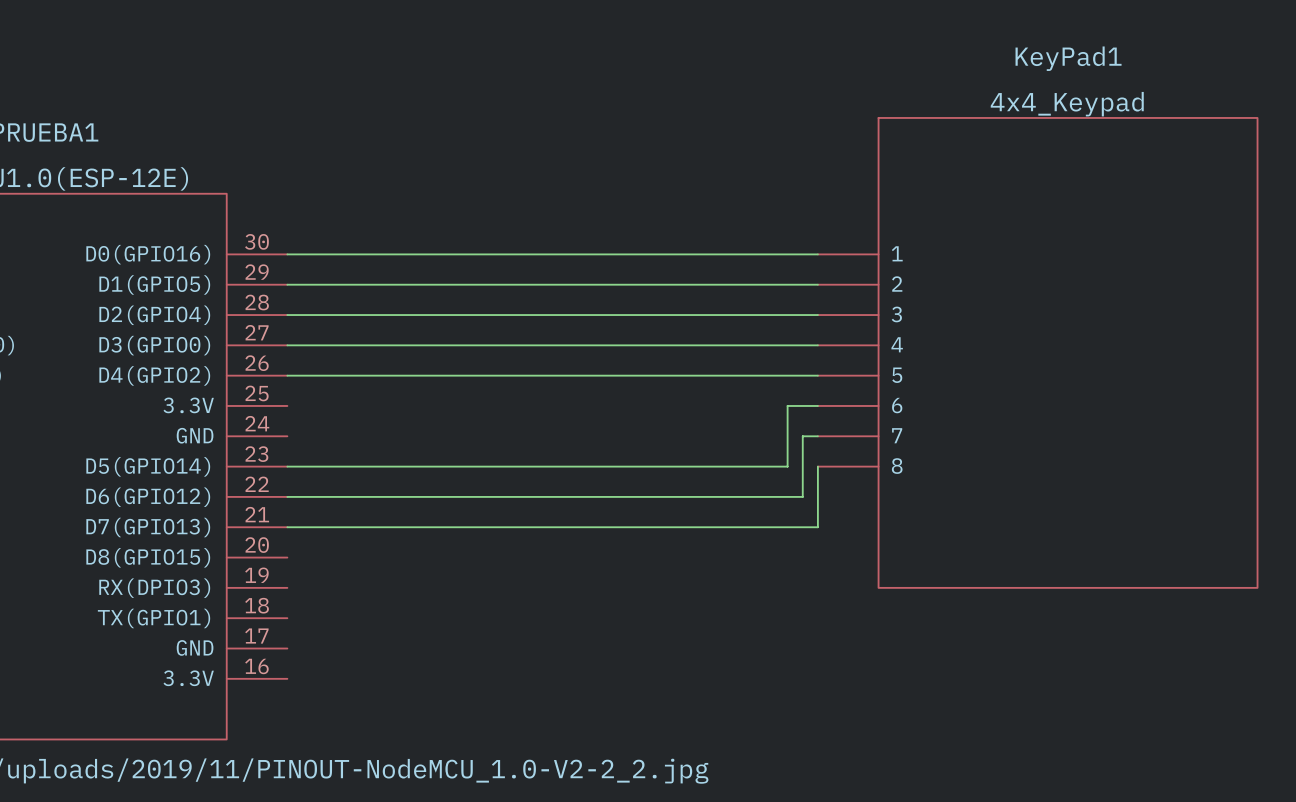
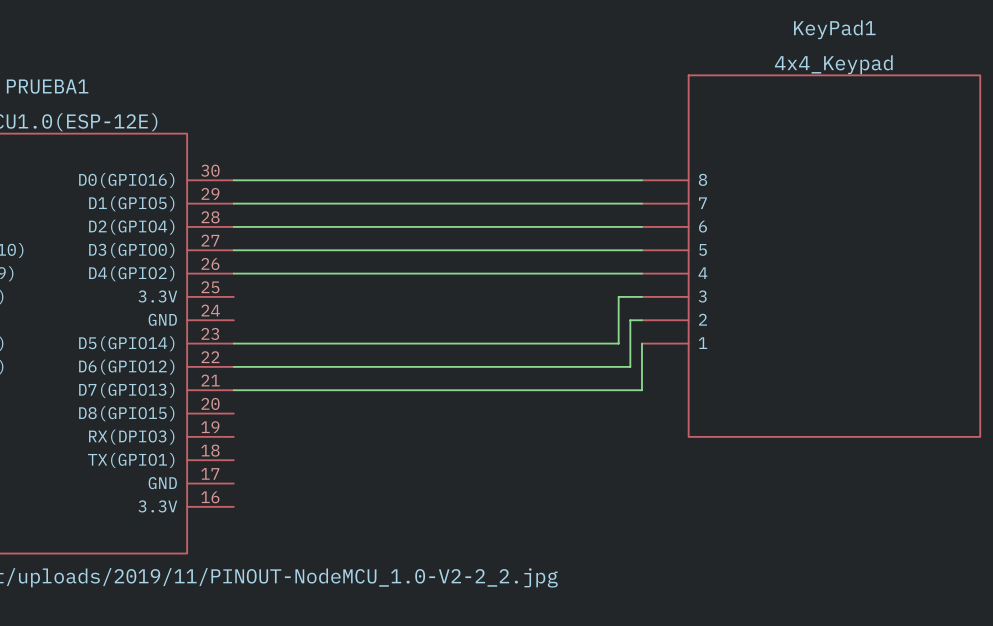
KeyPad1 pin name: 1 (897, 253) -> 8 (702, 179)
KeyPad1 pin name: 2 (897, 284) -> 7 (702, 203)
KeyPad1 pin name: 3 (896, 314) -> 6 (702, 226)
KeyPad1 pin name: 4 (897, 344) -> 5 (703, 249)
KeyPad1 pin name: 5 (897, 375) -> 4 (702, 273)
KeyPad1 pin name: 6 (897, 405) -> 3 (702, 296)
KeyPad1 pin name: 7 (897, 435) -> 2 (703, 319)
KeyPad1 pin name: 8 (897, 466) -> 1 (703, 343)

